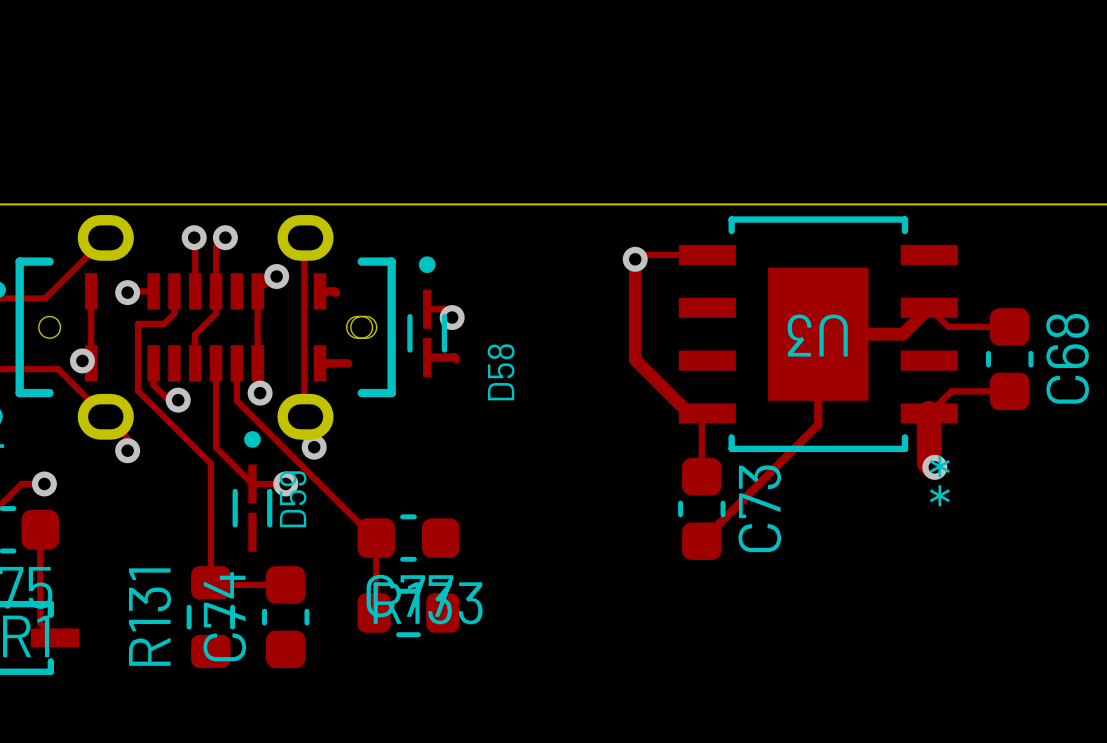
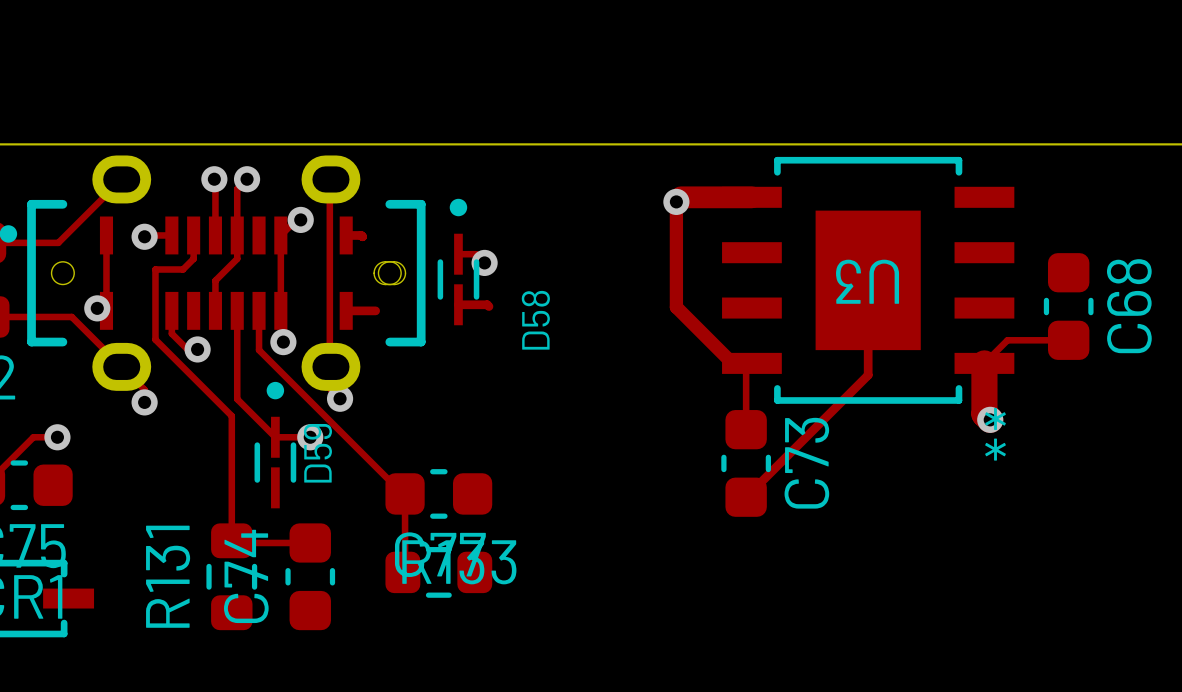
track width: thin (639, 254) (707, 254) -> thick (680, 197) (751, 197)
track: (1009, 326) (948, 326) (929, 307) (902, 334) (818, 334) -> none
track: (40, 529) (40, 623) (55, 637) -> none

